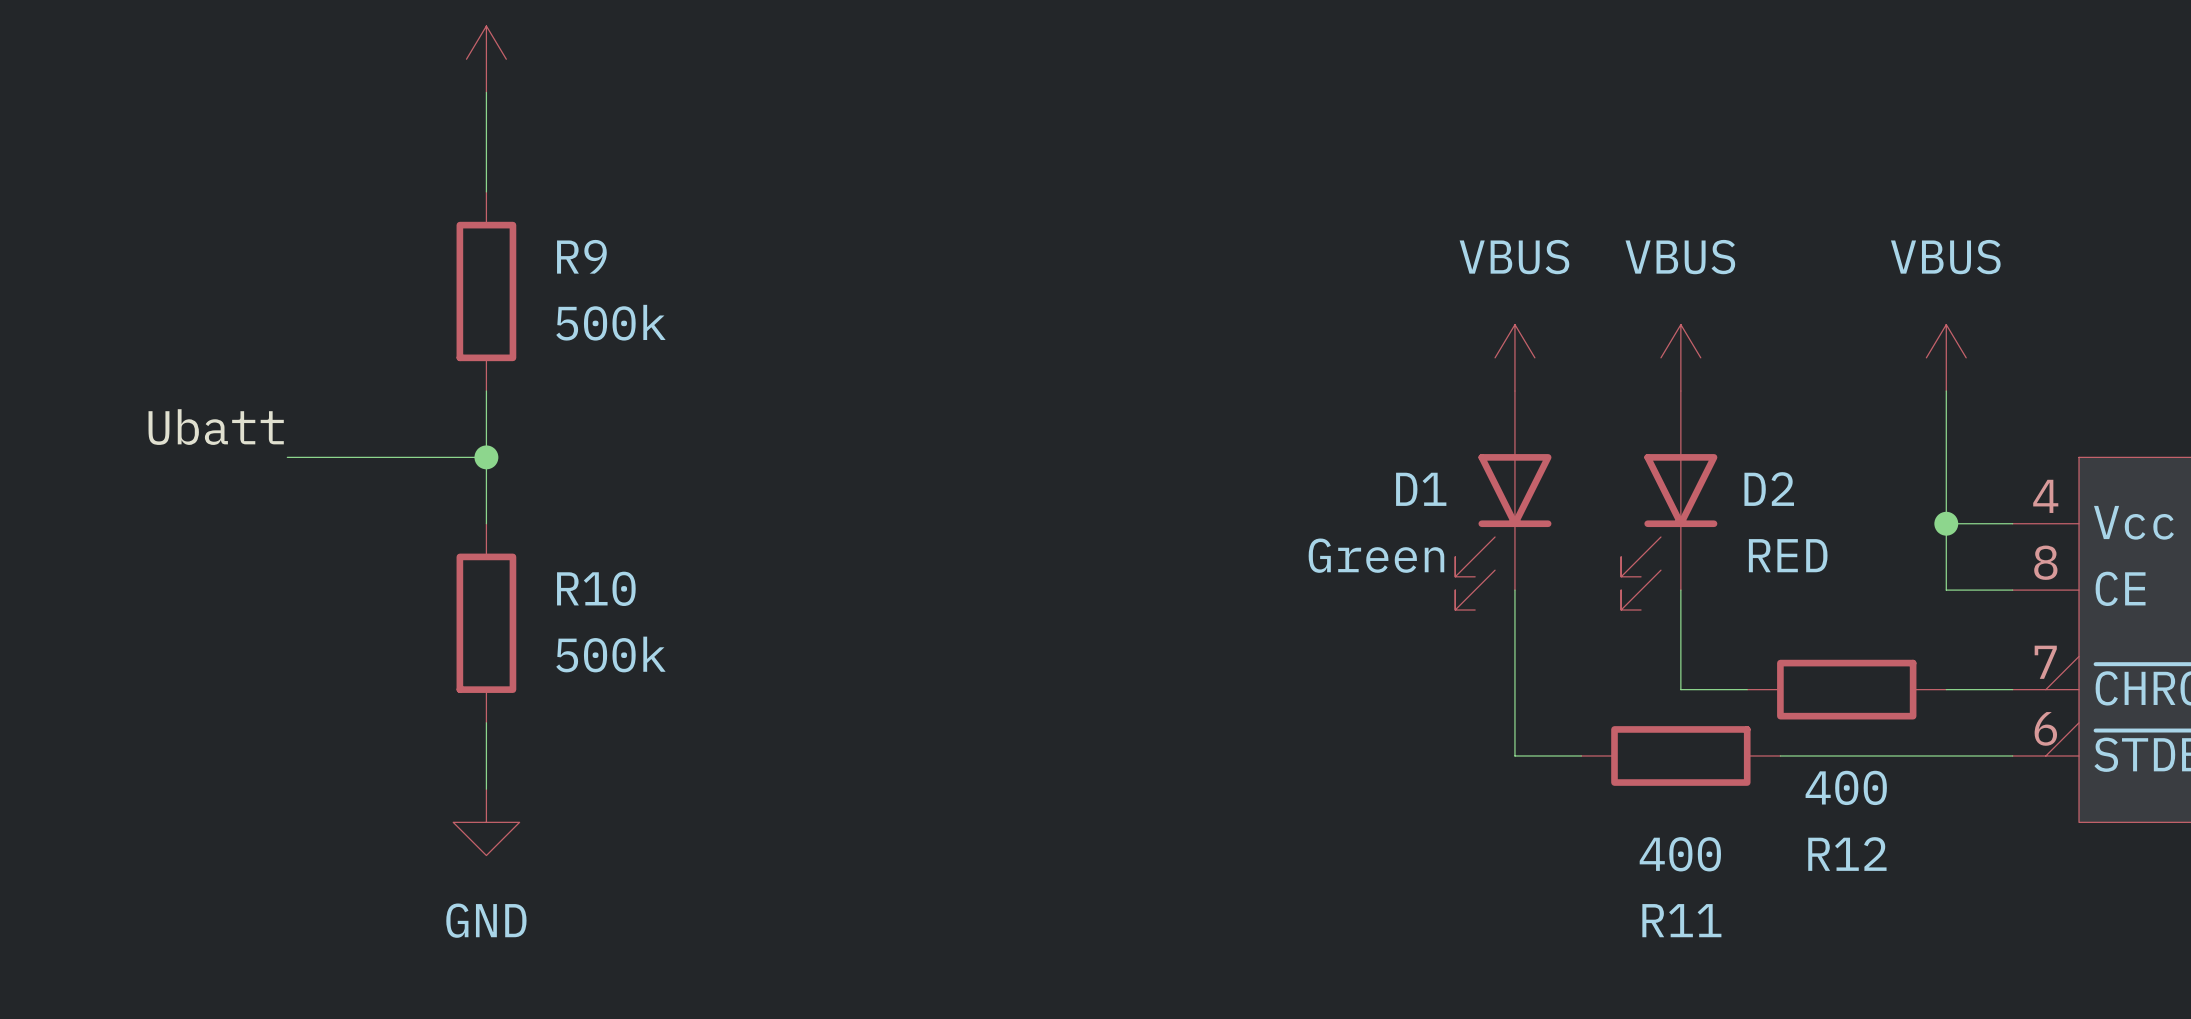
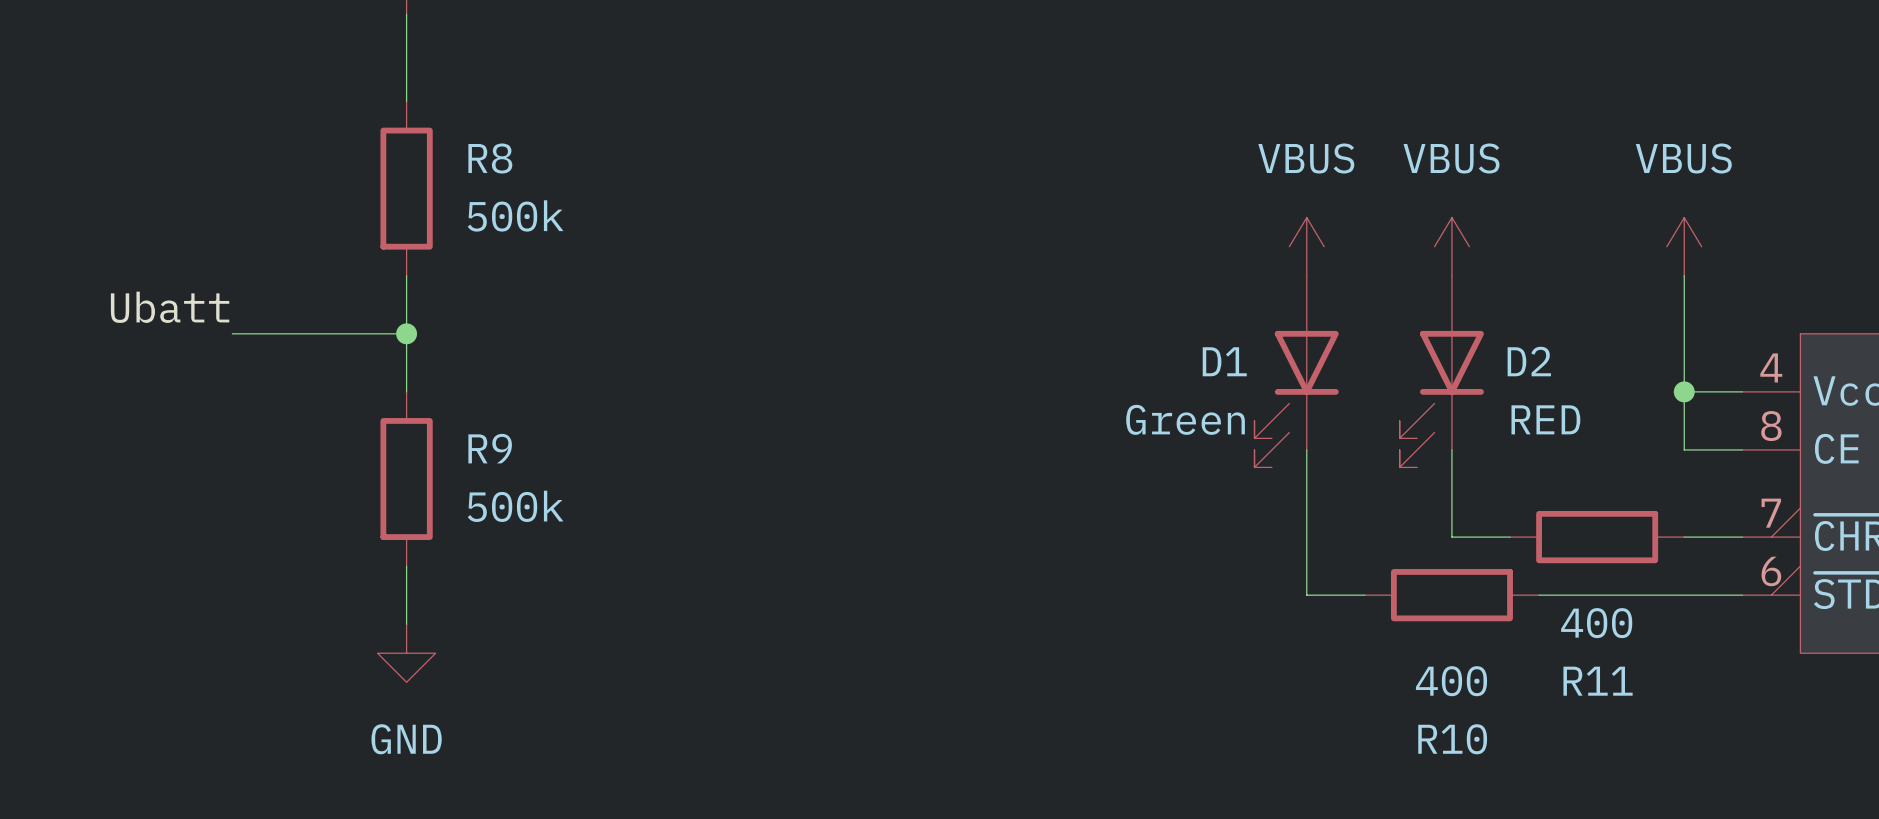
R9 name: R9 (581, 256) -> R8 (490, 158)
R10 name: R10 (596, 588) -> R9 (490, 448)
R12 name: R12 (1847, 854) -> R11 (1598, 681)
R11 name: R11 (1681, 920) -> R10 (1452, 739)

